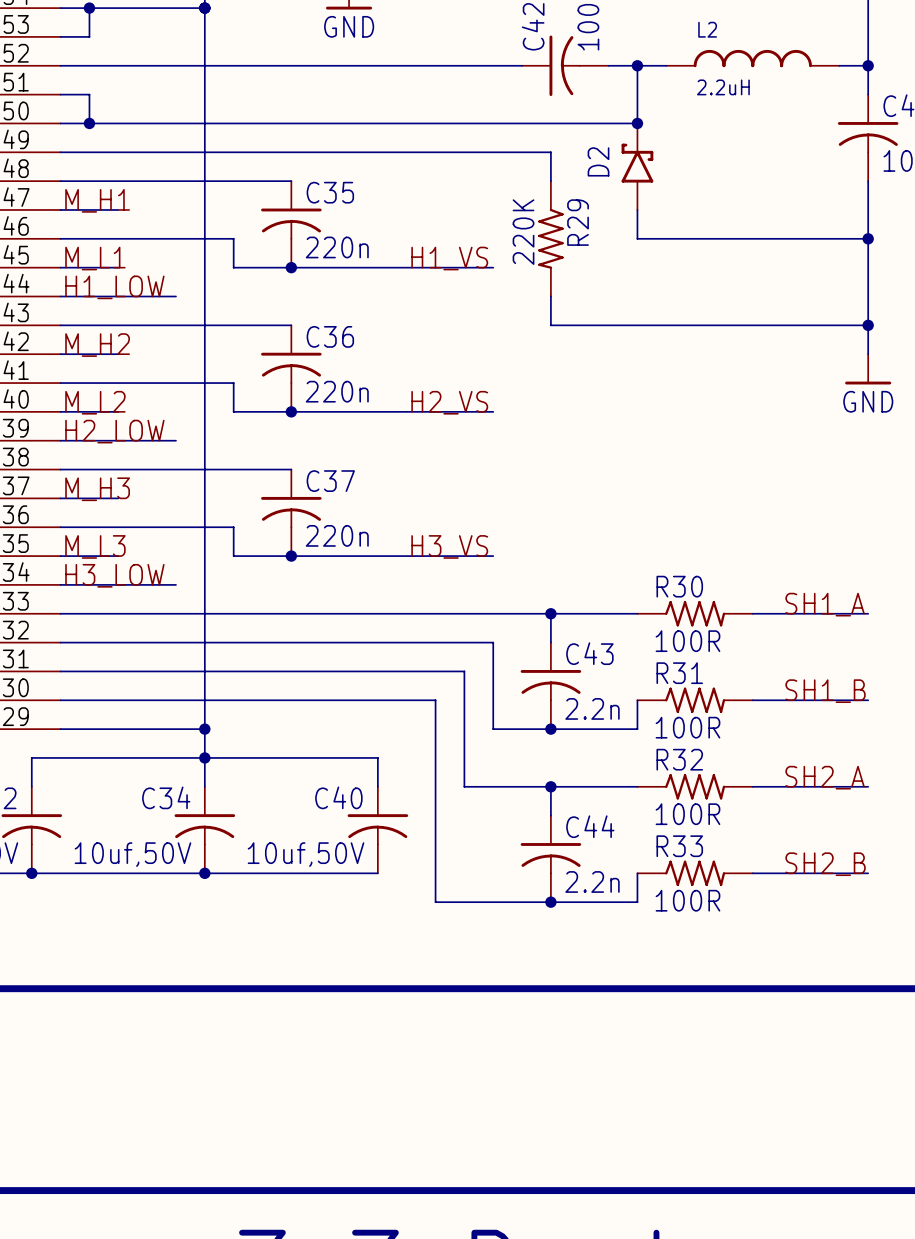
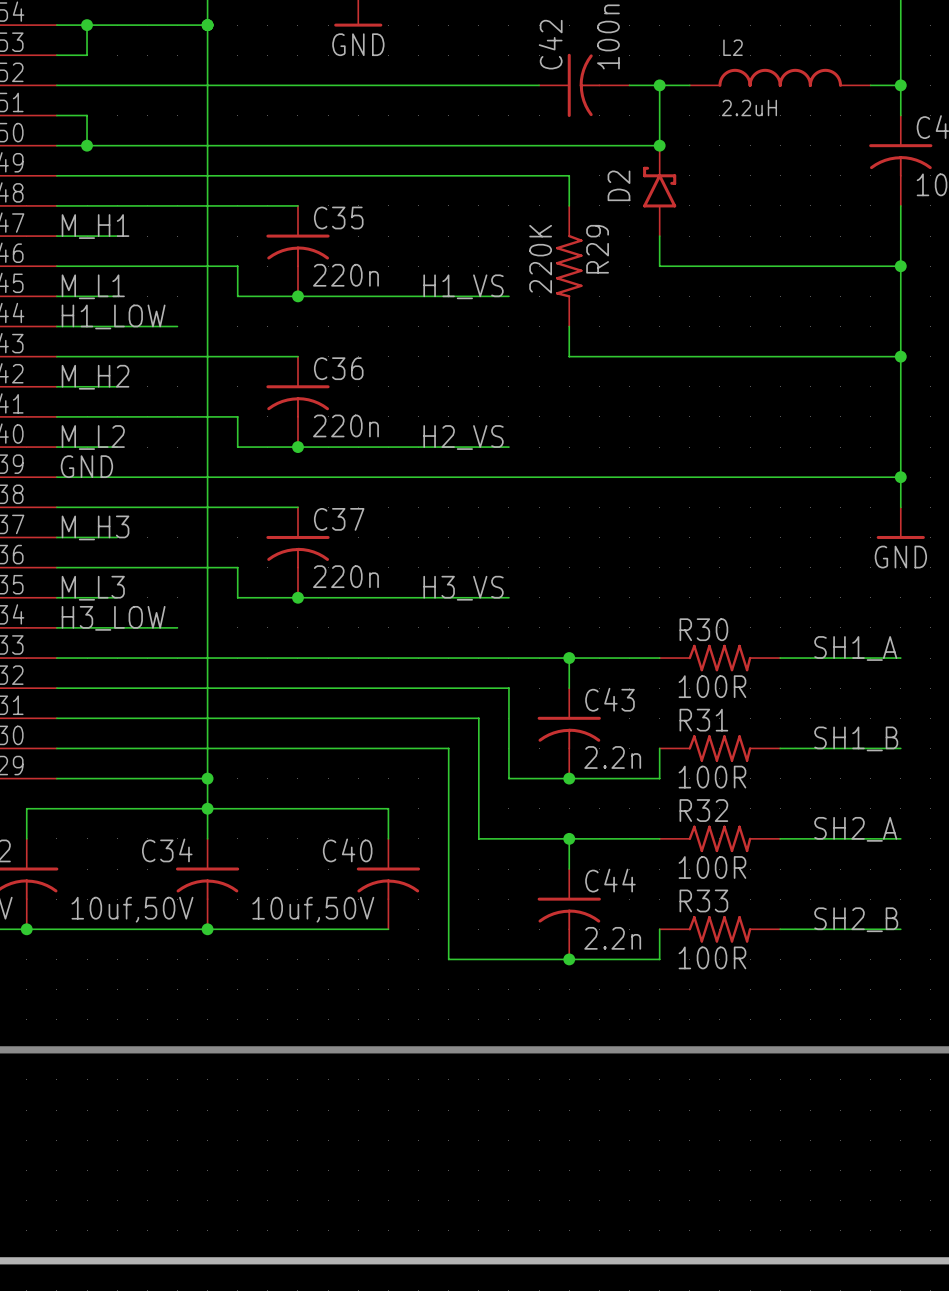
wire: none -> (900, 386) (900, 507)
power symbol position: GND (868, 369) -> GND (900, 523)
label: H2_LOW (114, 431) -> GND (86, 466)
wire: none -> (177, 477) (900, 477)
junction: none -> (900, 477)

